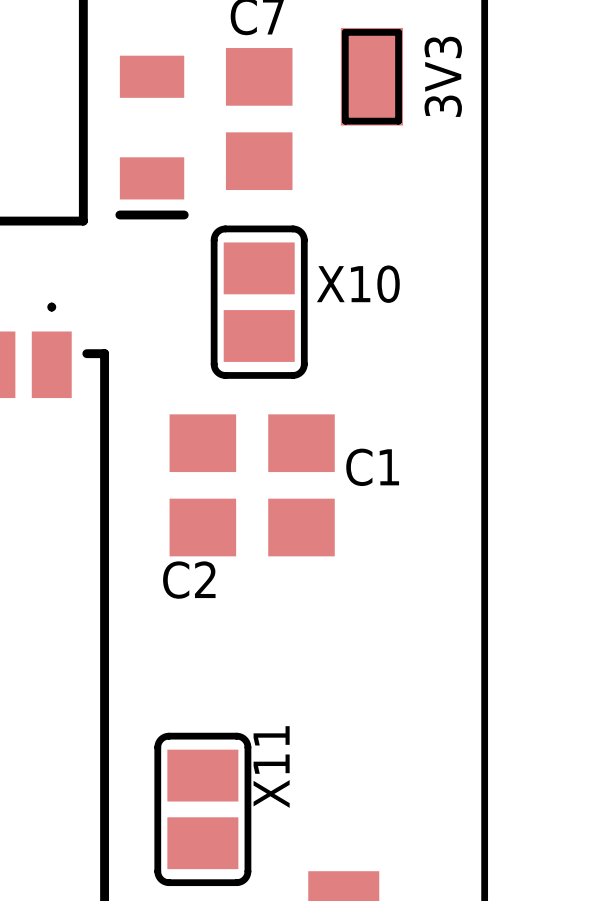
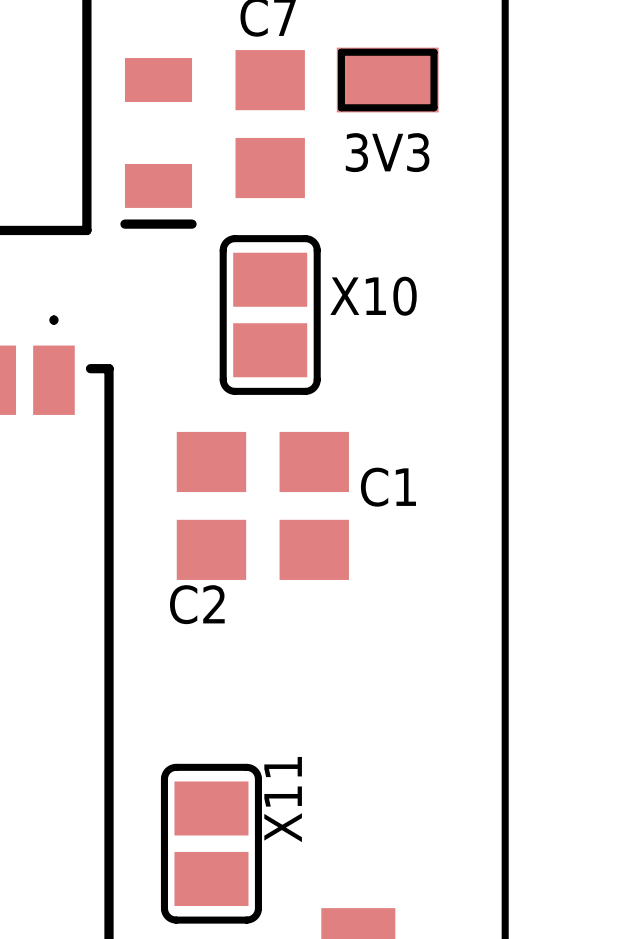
3V3 rotation: 0° (371, 76) -> 90° clockwise (387, 80)

